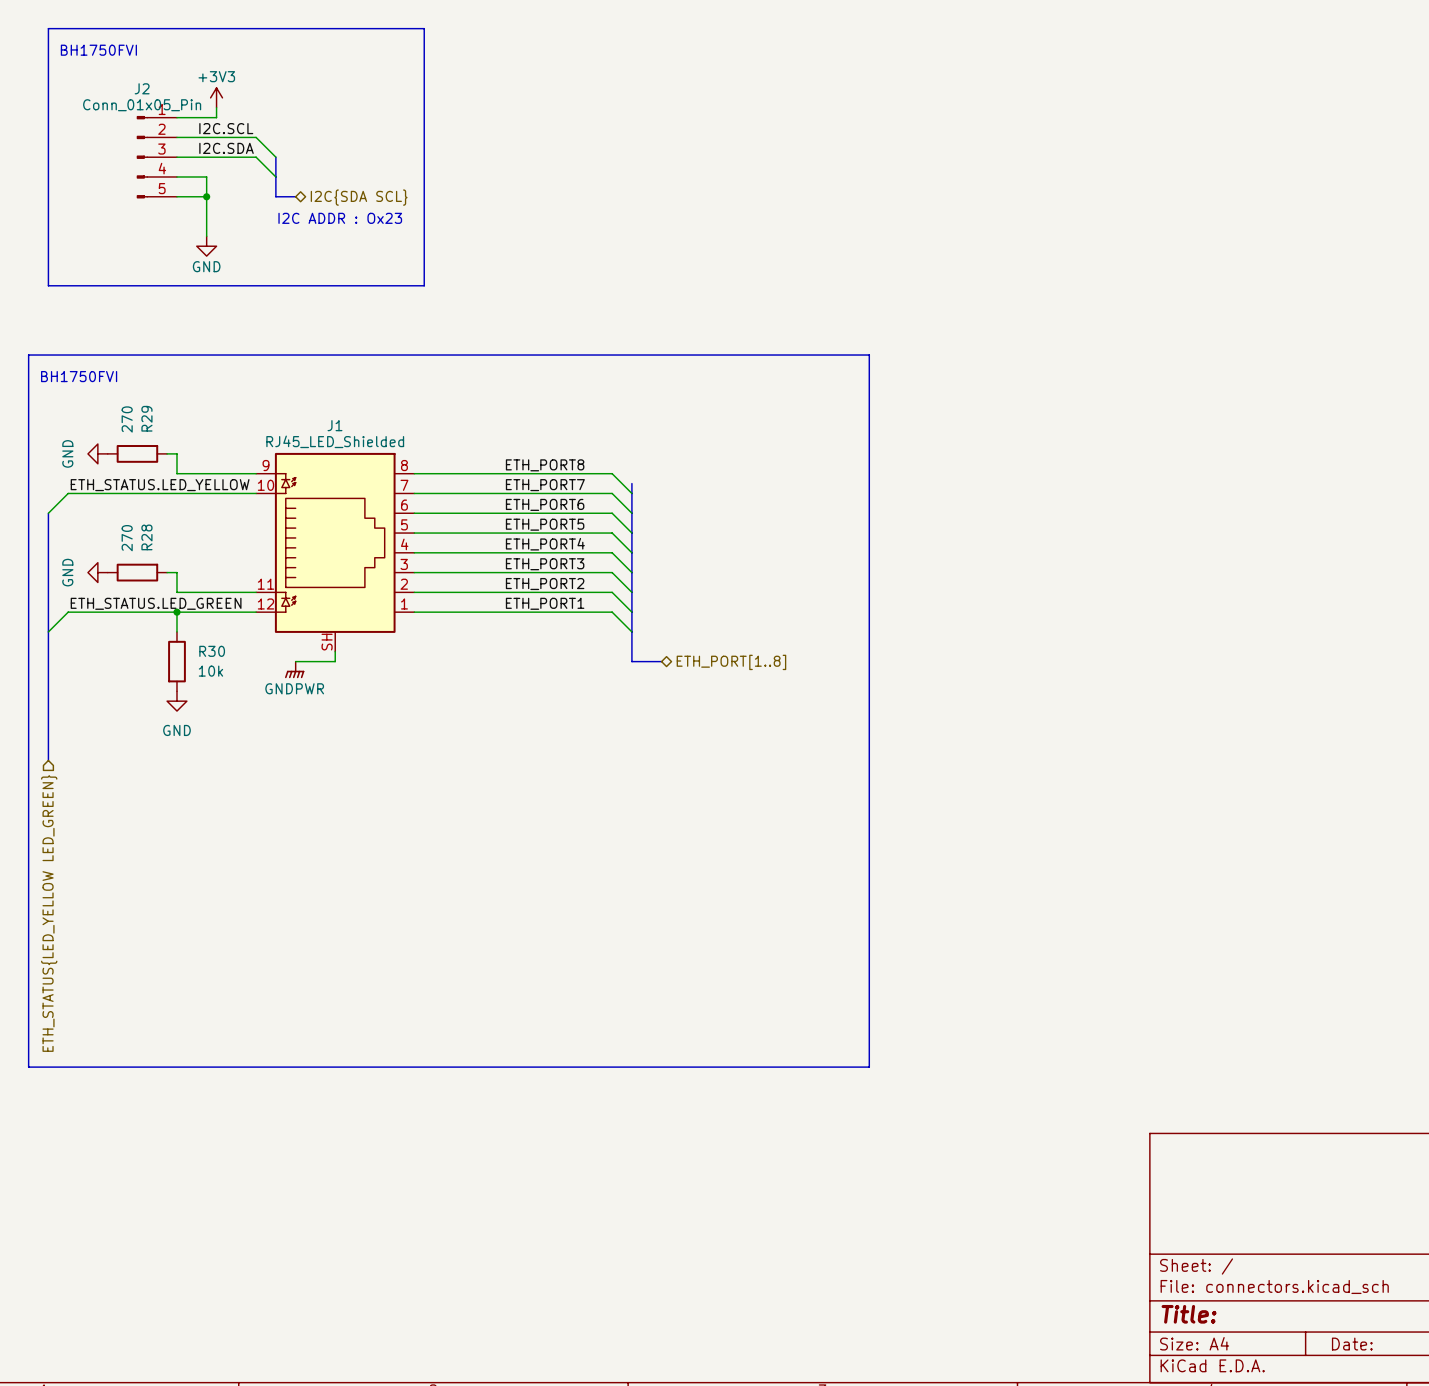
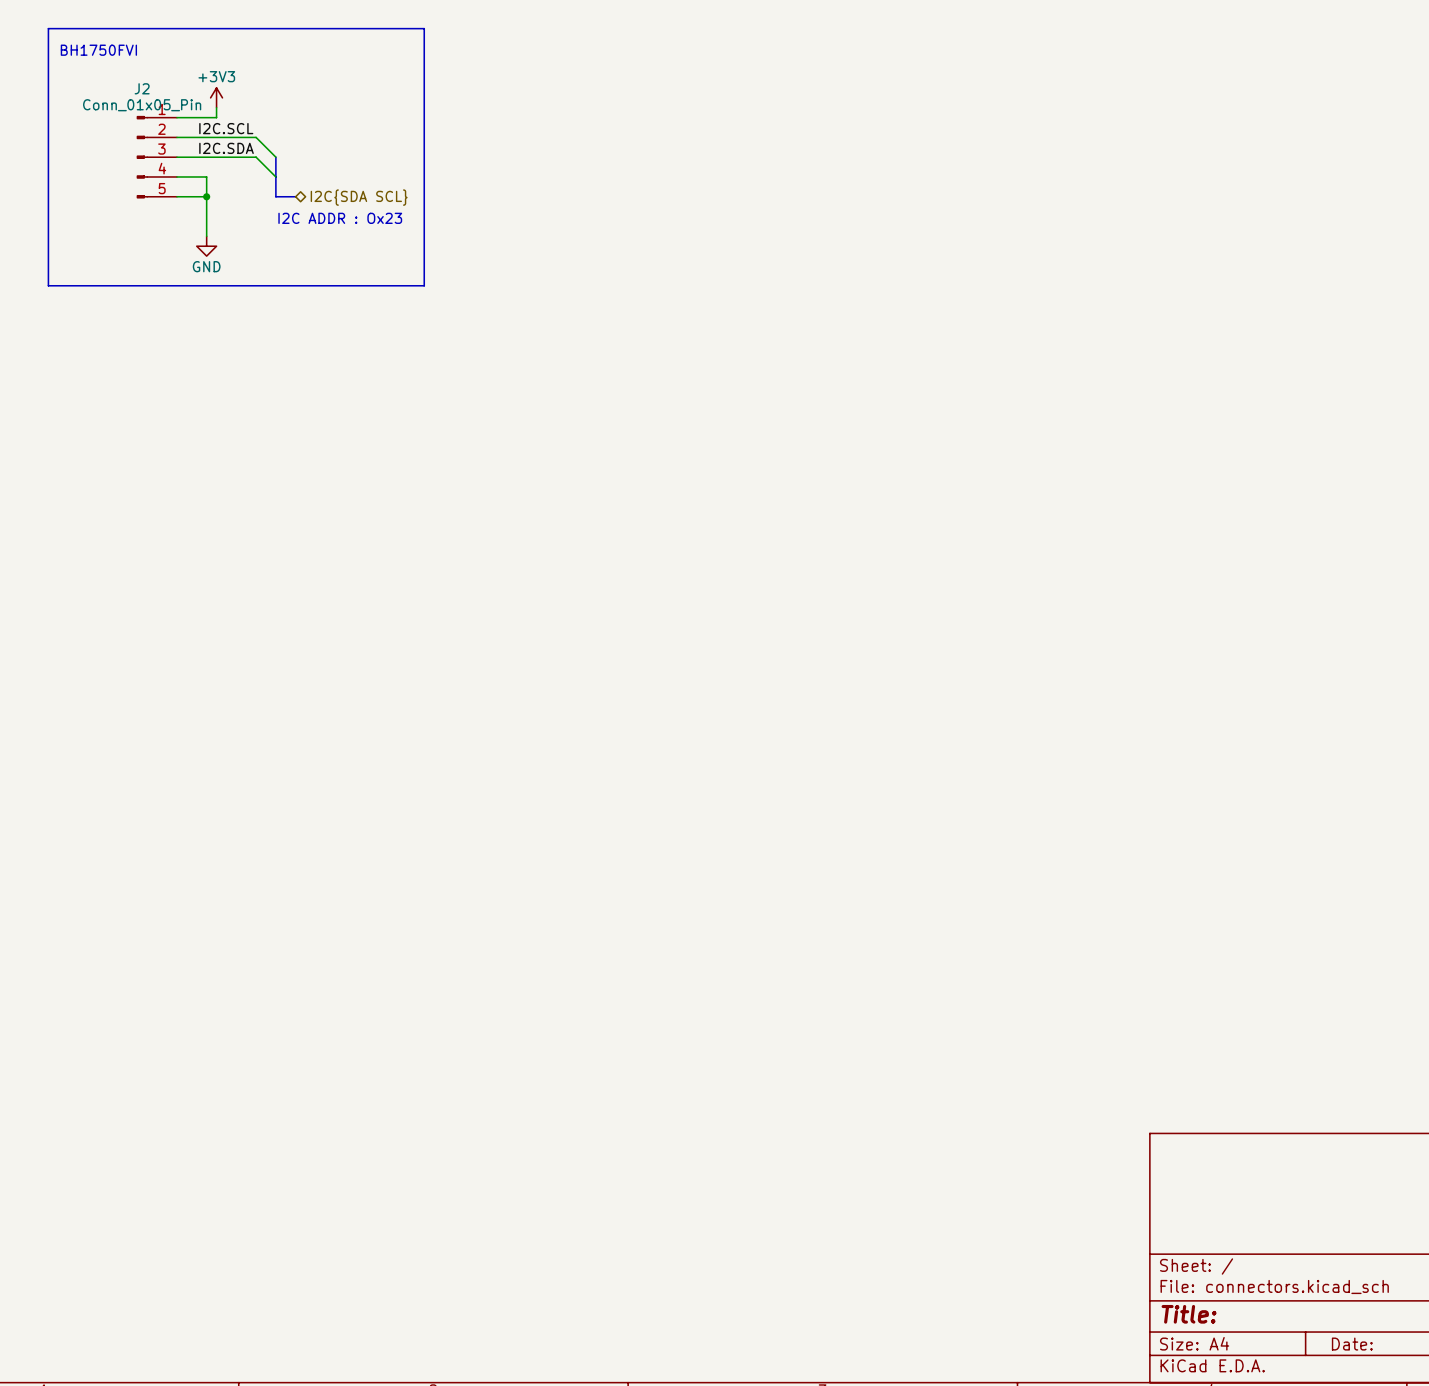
line: (28, 355) (869, 355) (869, 1067) (28, 1067) (28, 355) -> none
text: BH1750FVI (79, 376) -> none
power symbol: GND (97, 453) -> none
R29: 270 (137, 453) -> none
wire: (167, 453) (176, 453) (176, 473) (256, 473) -> none
label: ETH_PORT8 (545, 465) -> none
wire: (414, 473) (612, 473) (631, 493) -> none
bus: (631, 483) (631, 661) (661, 661) -> none
label: ETH_STATUS.LED_YELLOW (160, 485) -> none
label: ETH_PORT7 (545, 485) -> none
wire: (256, 493) (68, 493) (48, 513) -> none
wire: (414, 493) (612, 493) (631, 513) -> none
label: ETH_PORT6 (545, 504) -> none
bus: (48, 513) (48, 760) -> none
wire: (414, 513) (612, 513) (631, 533) -> none
label: ETH_PORT5 (545, 524) -> none
wire: (414, 533) (612, 533) (631, 552) -> none
label: ETH_PORT4 (545, 544) -> none
J1: RJ45_LED_Shielded (335, 552) -> none
wire: (414, 552) (612, 552) (631, 572) -> none
label: ETH_PORT3 (545, 564) -> none
power symbol: GND (97, 572) -> none
R28: 270 (137, 572) -> none
wire: (167, 572) (176, 572) (176, 592) (256, 592) -> none
wire: (414, 572) (612, 572) (631, 592) -> none
label: ETH_PORT2 (545, 584) -> none
wire: (414, 592) (612, 592) (631, 612) -> none
label: ETH_STATUS.LED_GREEN (156, 603) -> none
label: ETH_PORT1 (545, 603) -> none
wire: (176, 612) (176, 631) -> none
junction: (176, 612) -> none
wire: (256, 612) (68, 612) (48, 631) -> none
wire: (414, 612) (612, 612) (631, 631) -> none
wire: (335, 651) (335, 661) (295, 661) -> none
R30: 10k (176, 661) -> none
hierarchical label: ETH_PORT[1..8] (731, 662) -> none
power symbol: GNDPWR (294, 669) -> none
power symbol: GND (176, 701) -> none
hierarchical label: ETH_STATUS{LED_YELLOW LED_GREEN} (49, 913) -> none

